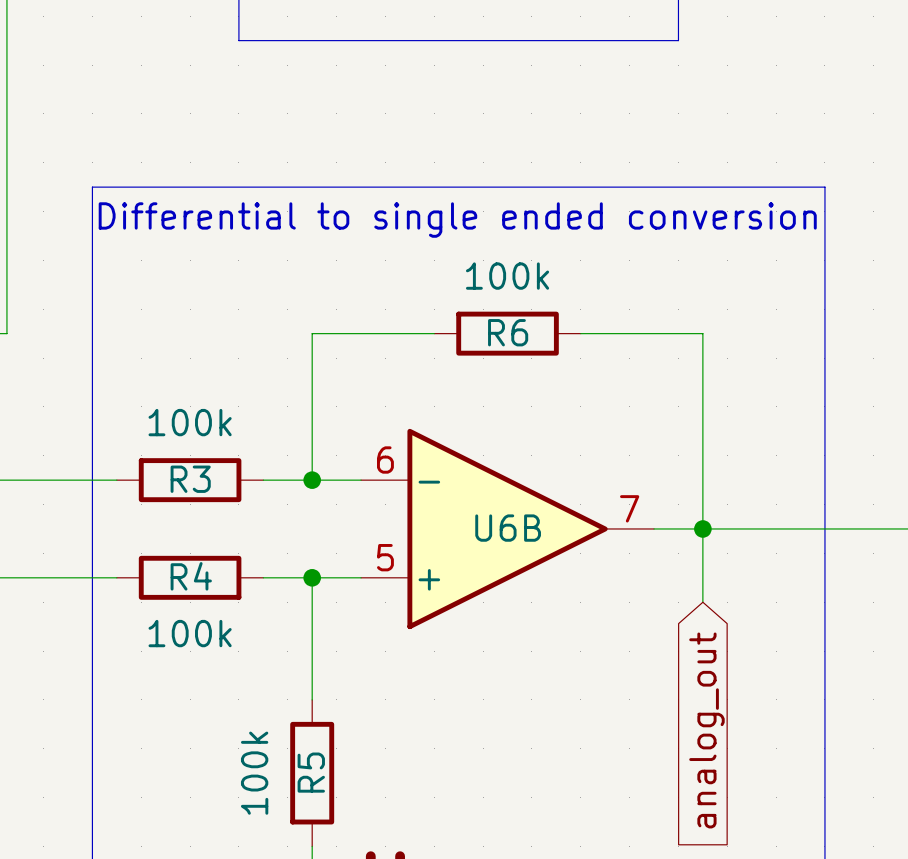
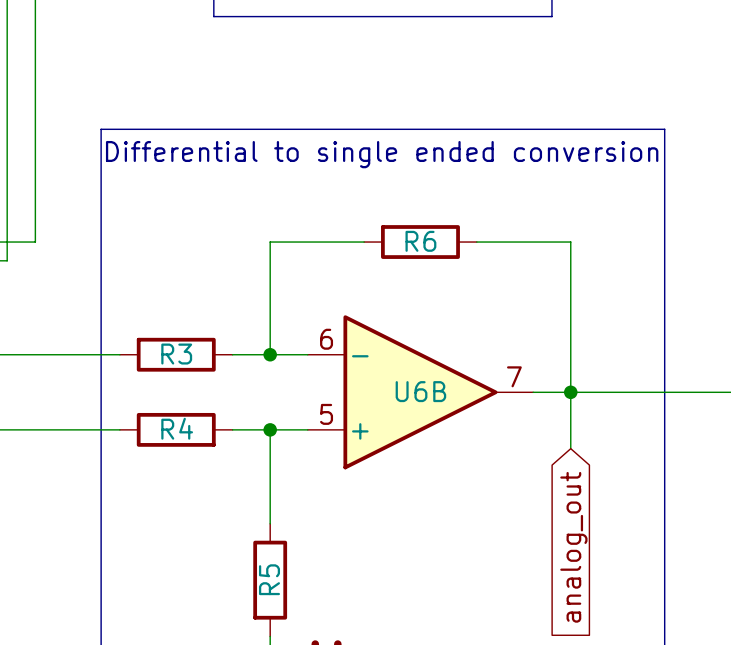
R6 value: 100k (507, 276) -> none
R3 value: 100k (190, 422) -> none
R4 value: 100k (190, 633) -> none
R5 value: 100k (254, 773) -> none

